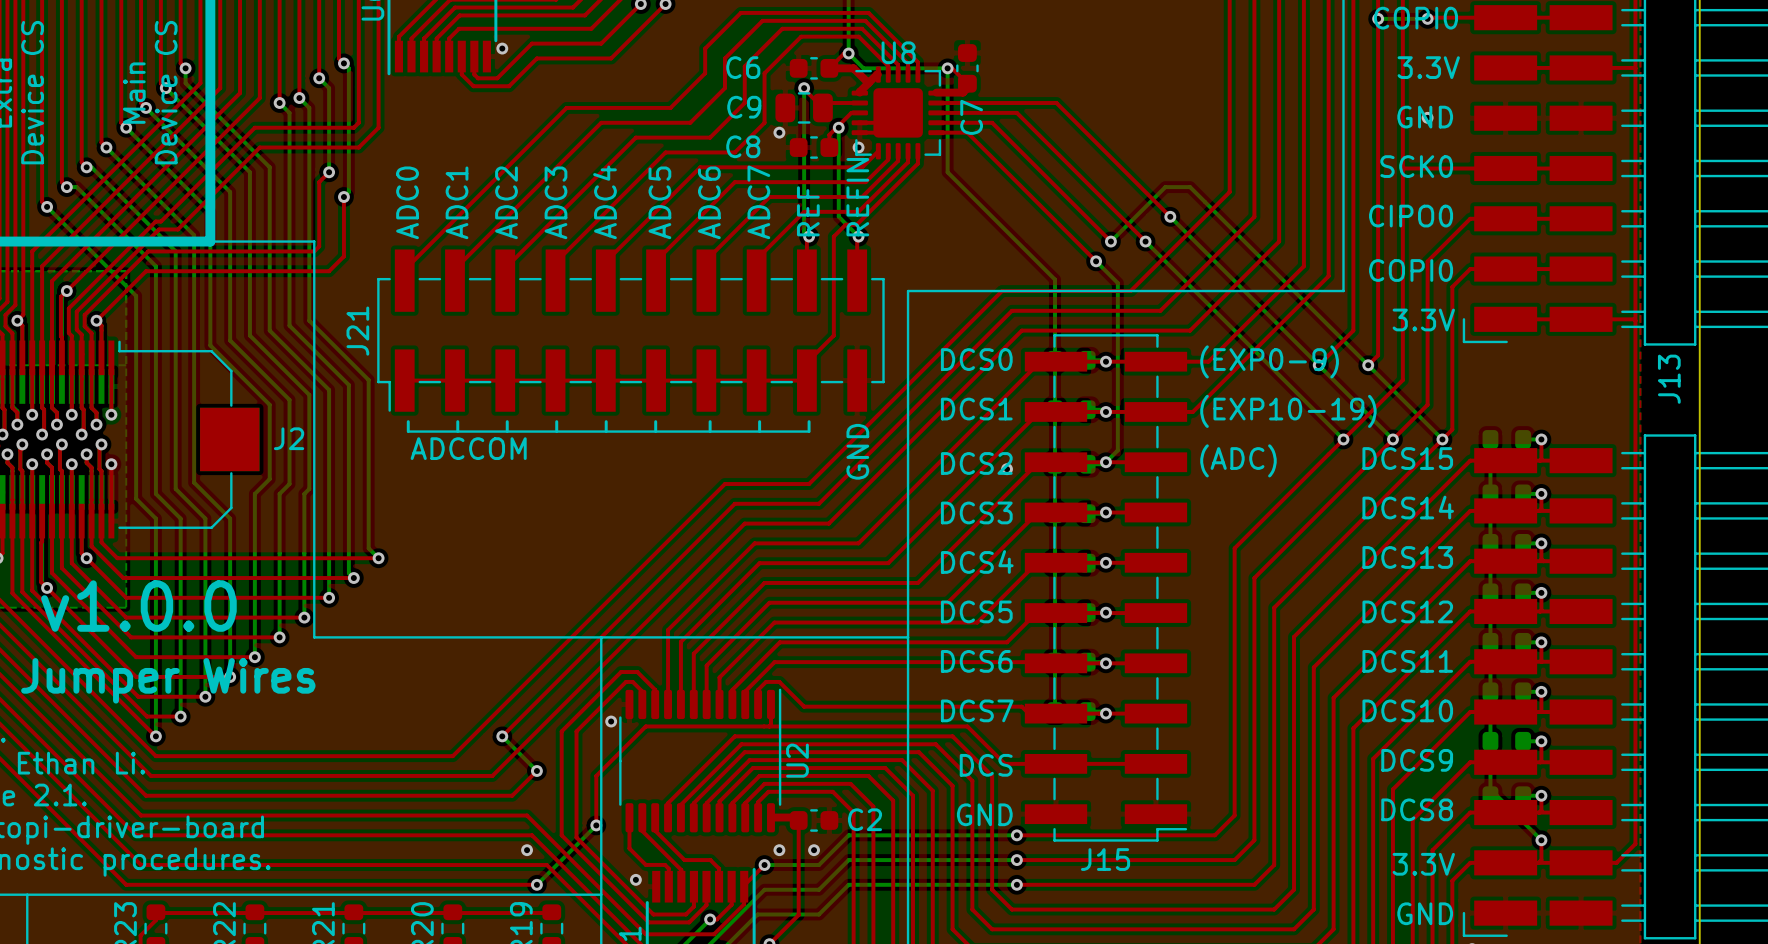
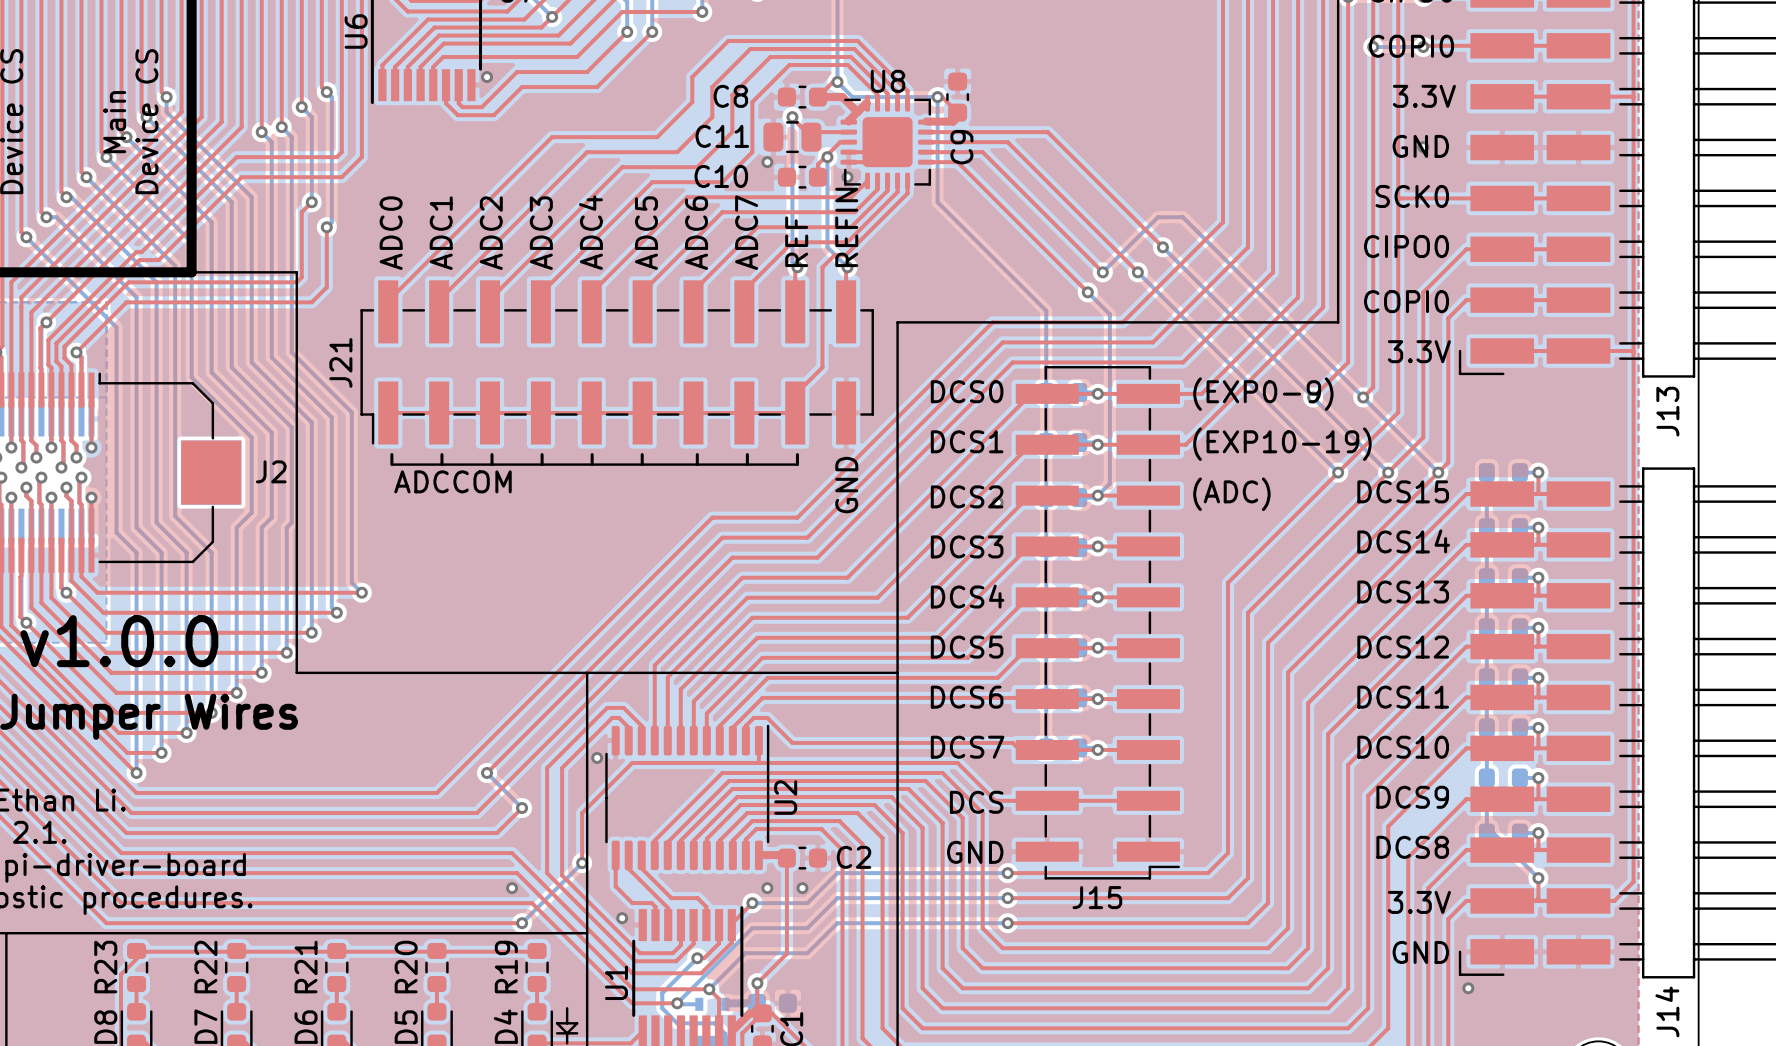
C6 name: C6 (743, 67) -> C8 (730, 96)
C9 name: C9 (744, 107) -> C11 (722, 136)
C7 name: C7 (971, 117) -> C9 (961, 147)
C8 name: C8 (743, 146) -> C10 (721, 176)

